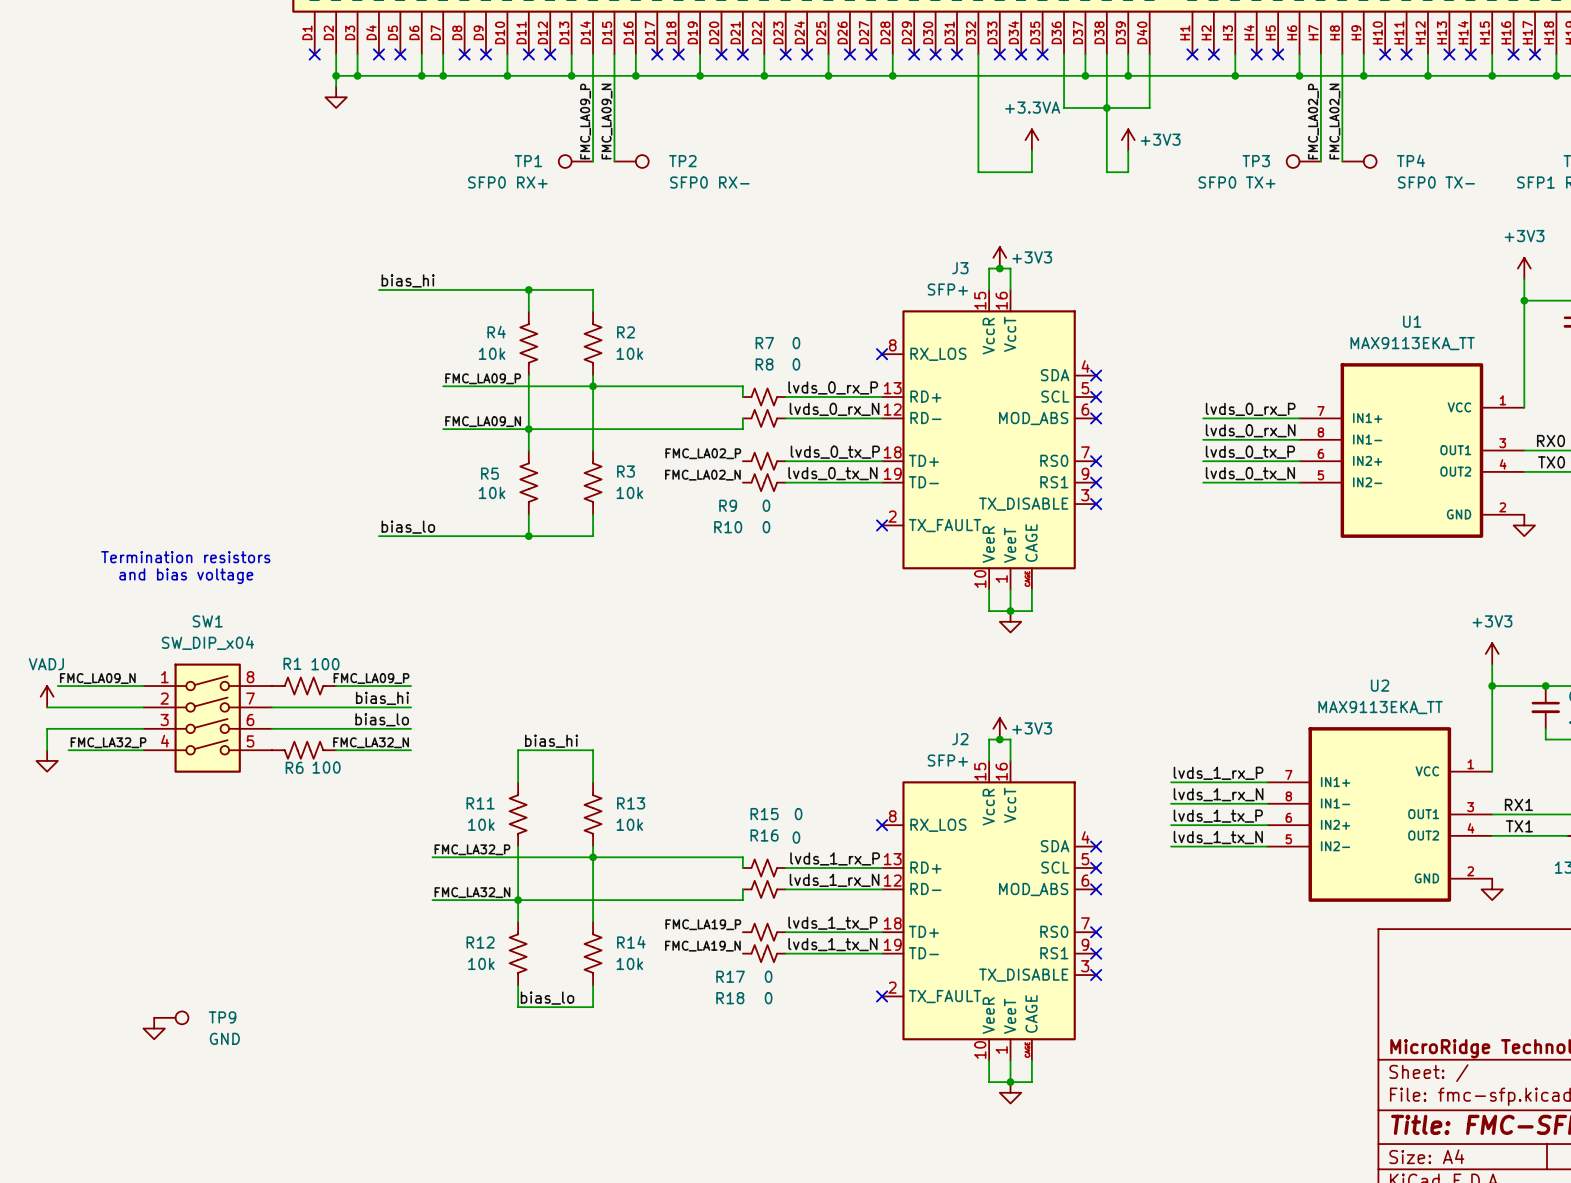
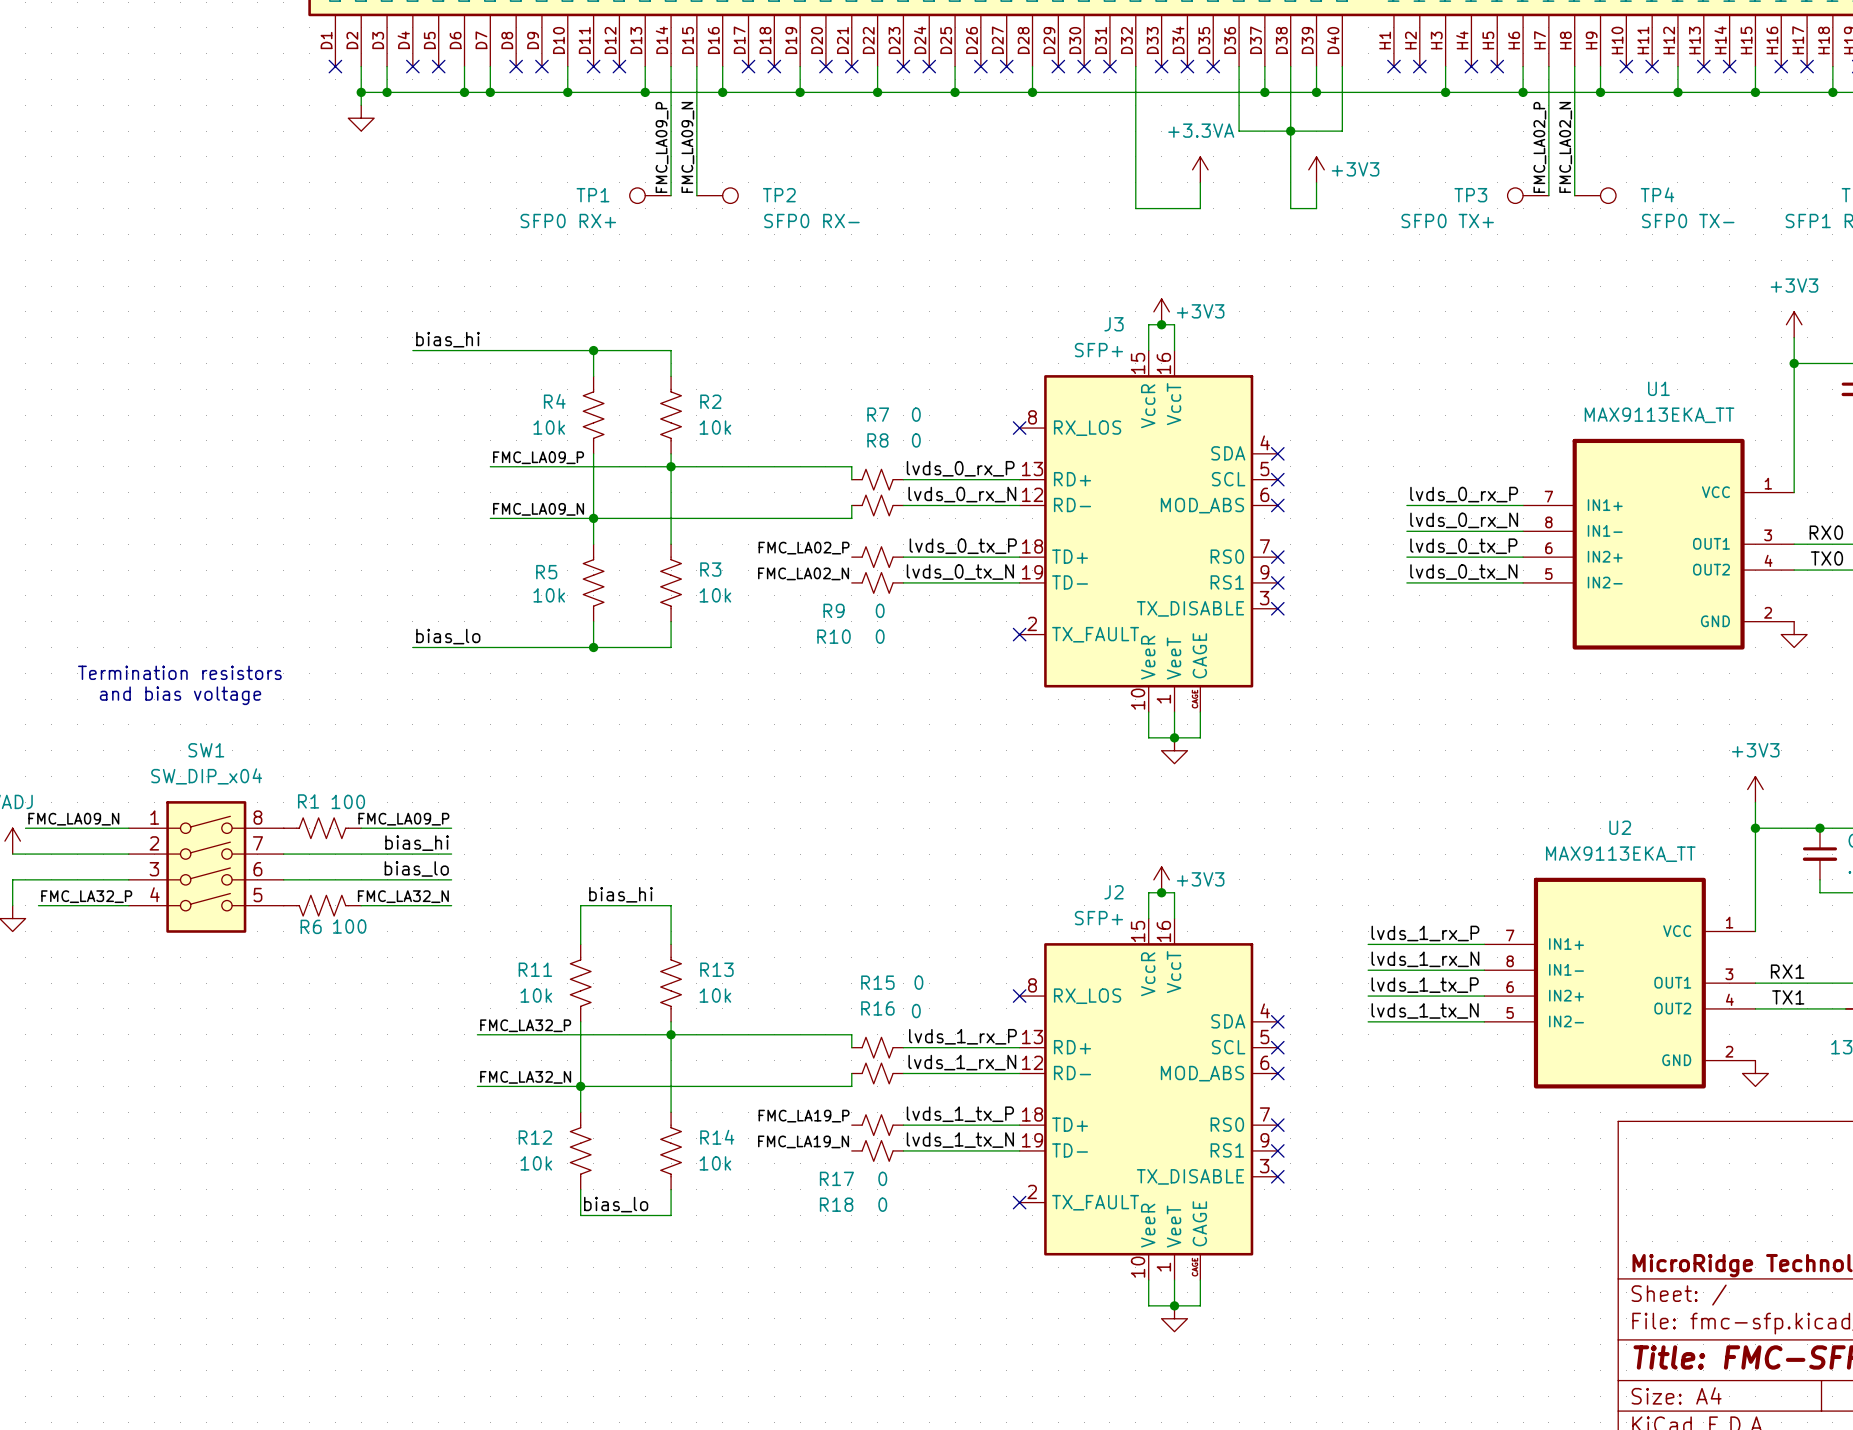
TP9: GND (171, 1017) -> none
power symbol: (154, 1028) -> none

